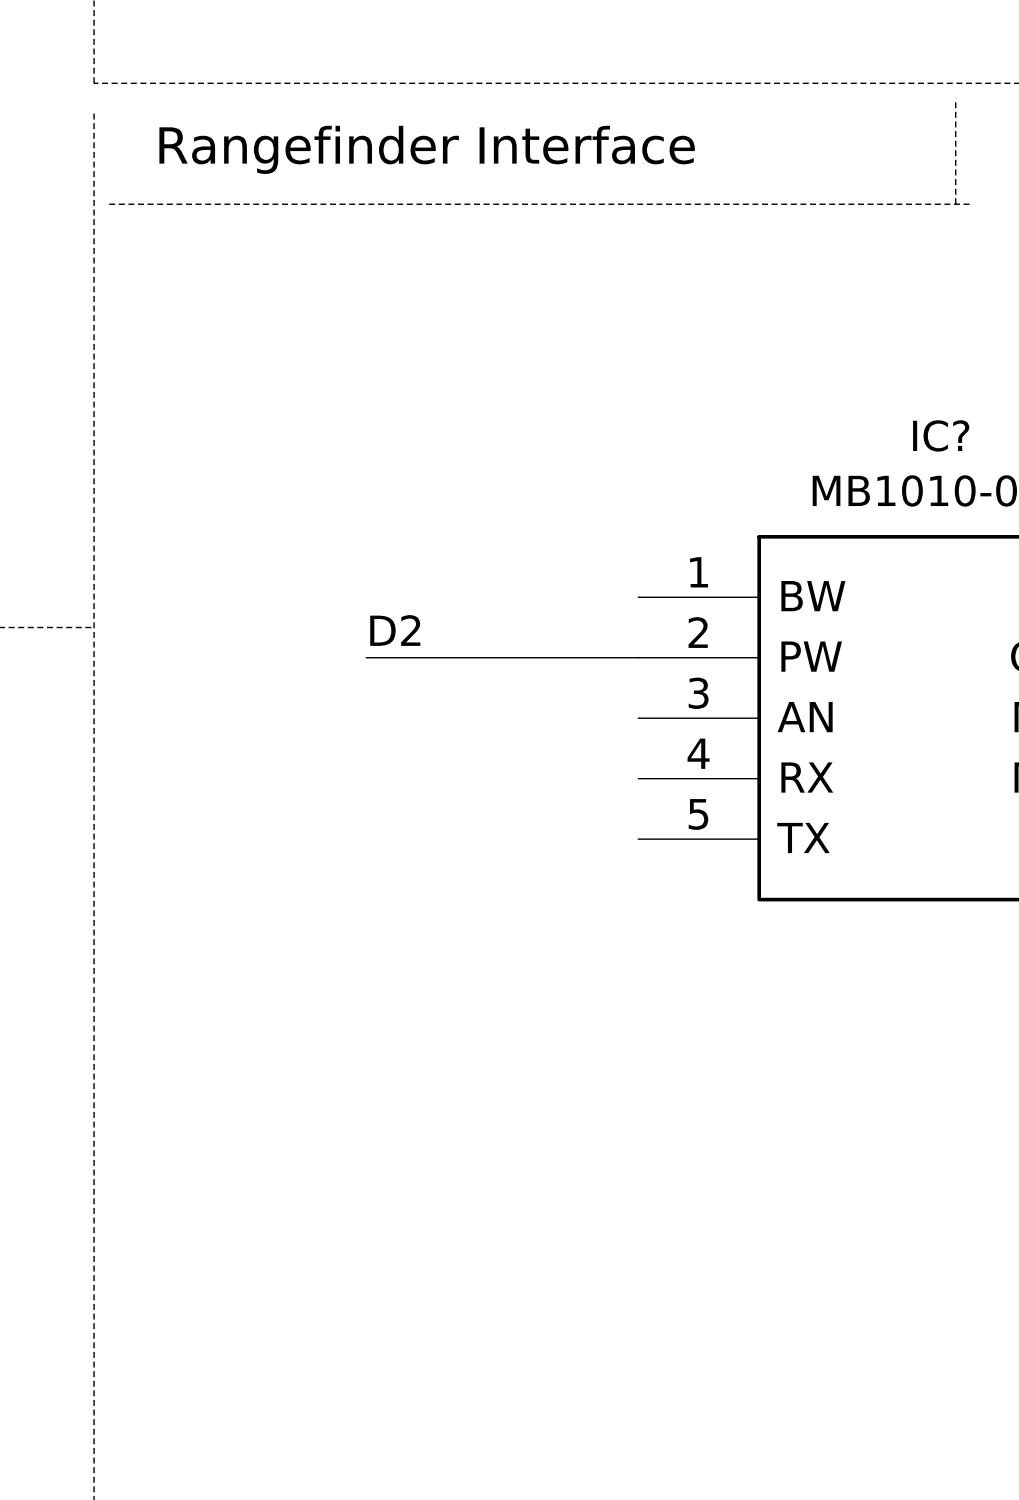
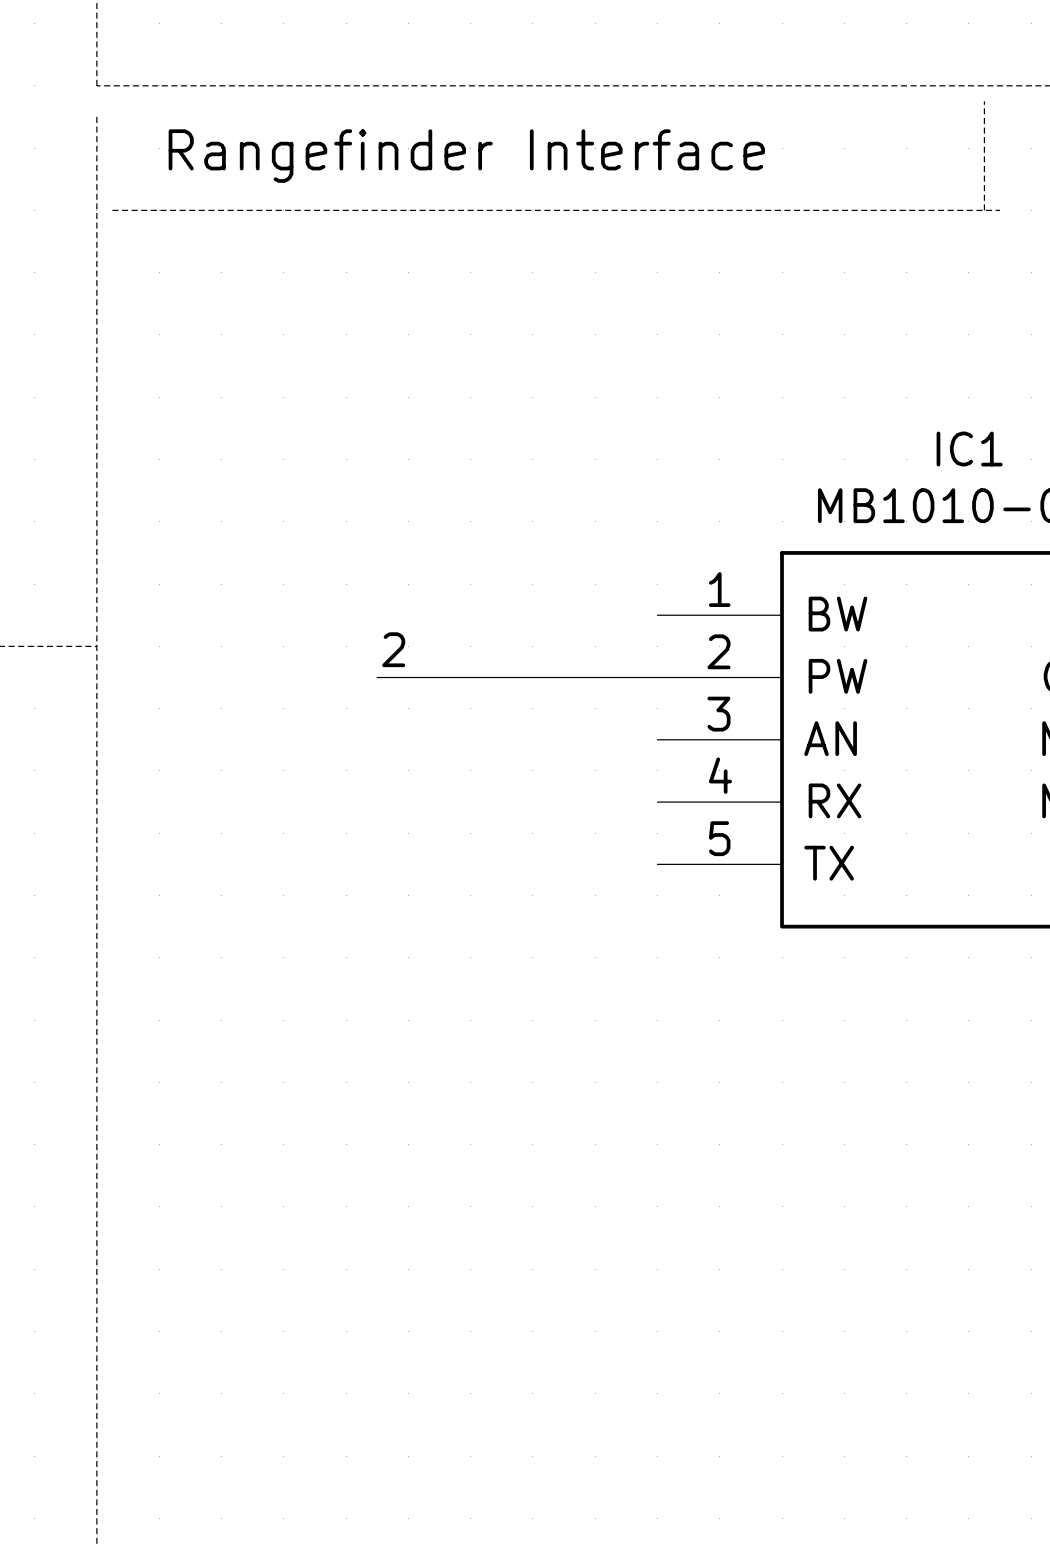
IC? name: IC? (941, 435) -> IC1 (969, 449)
label: D2 (395, 630) -> 2 (393, 649)

